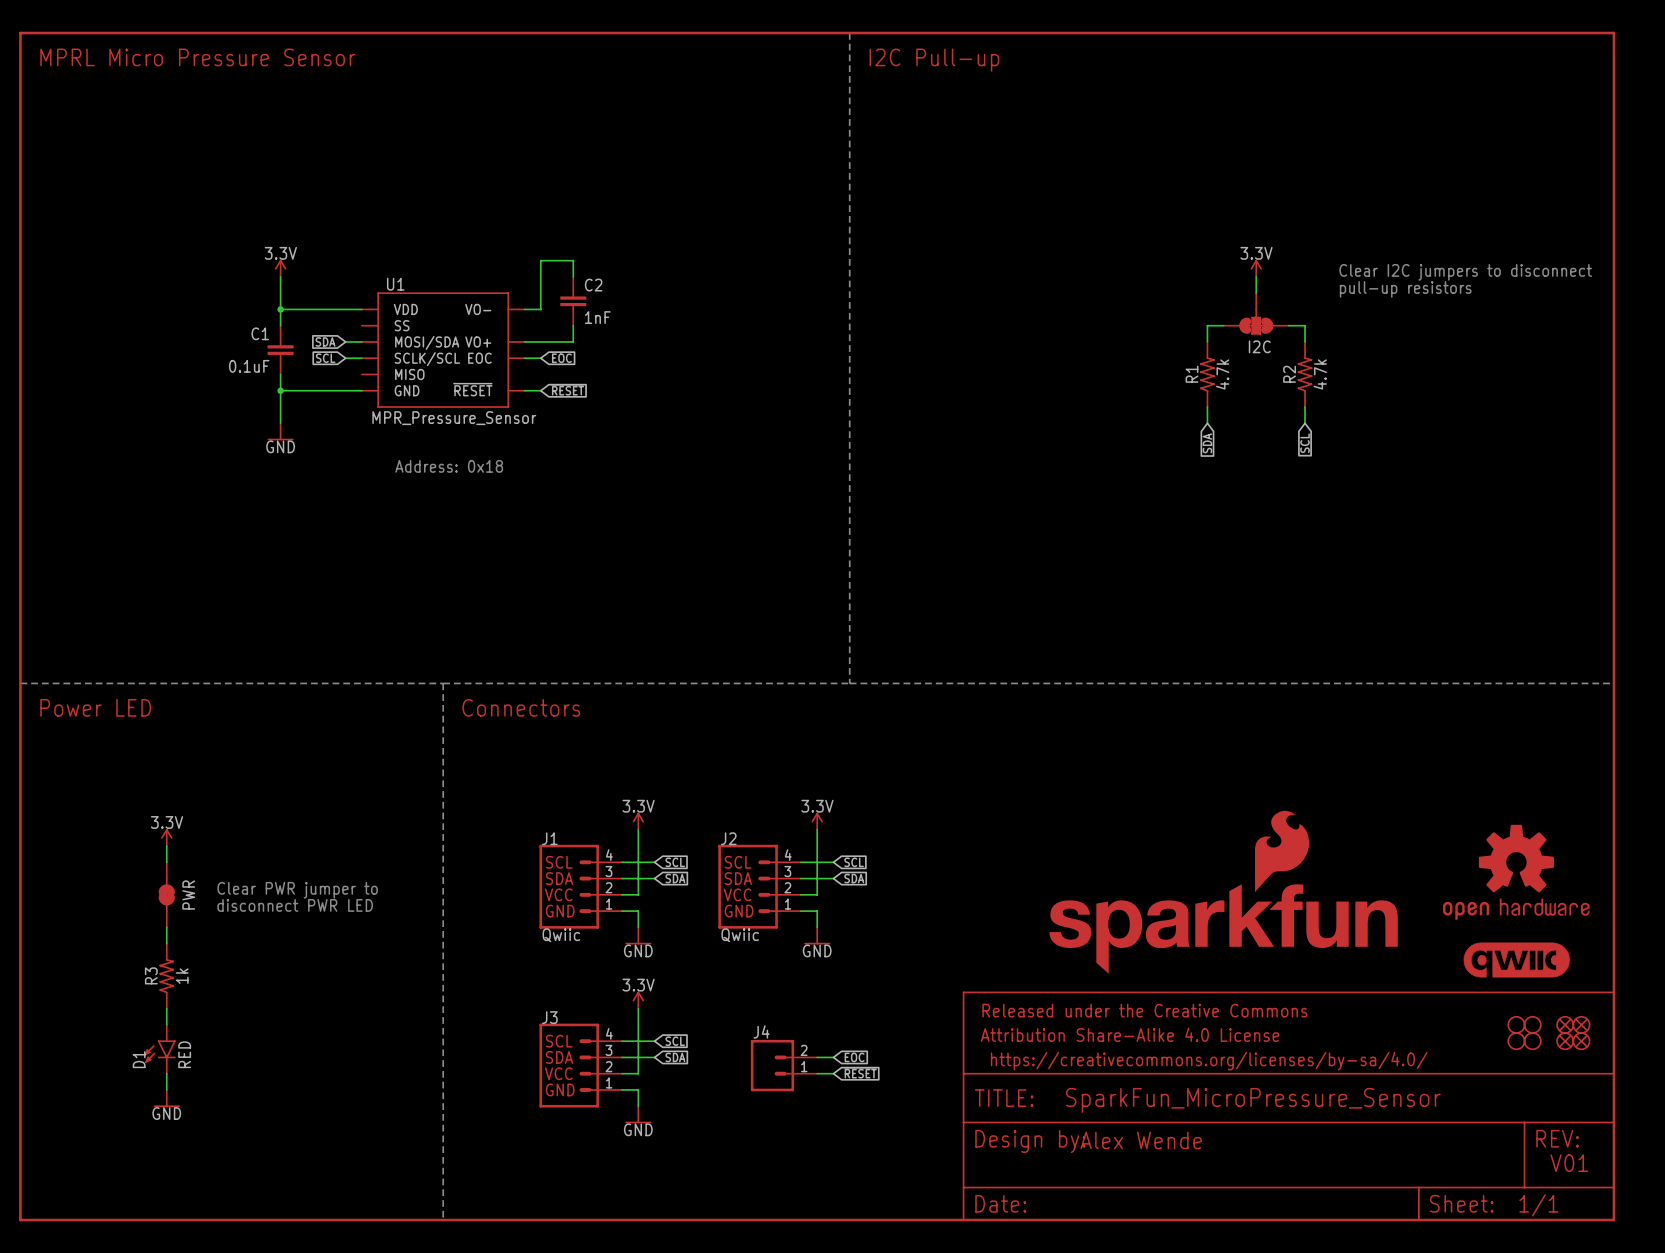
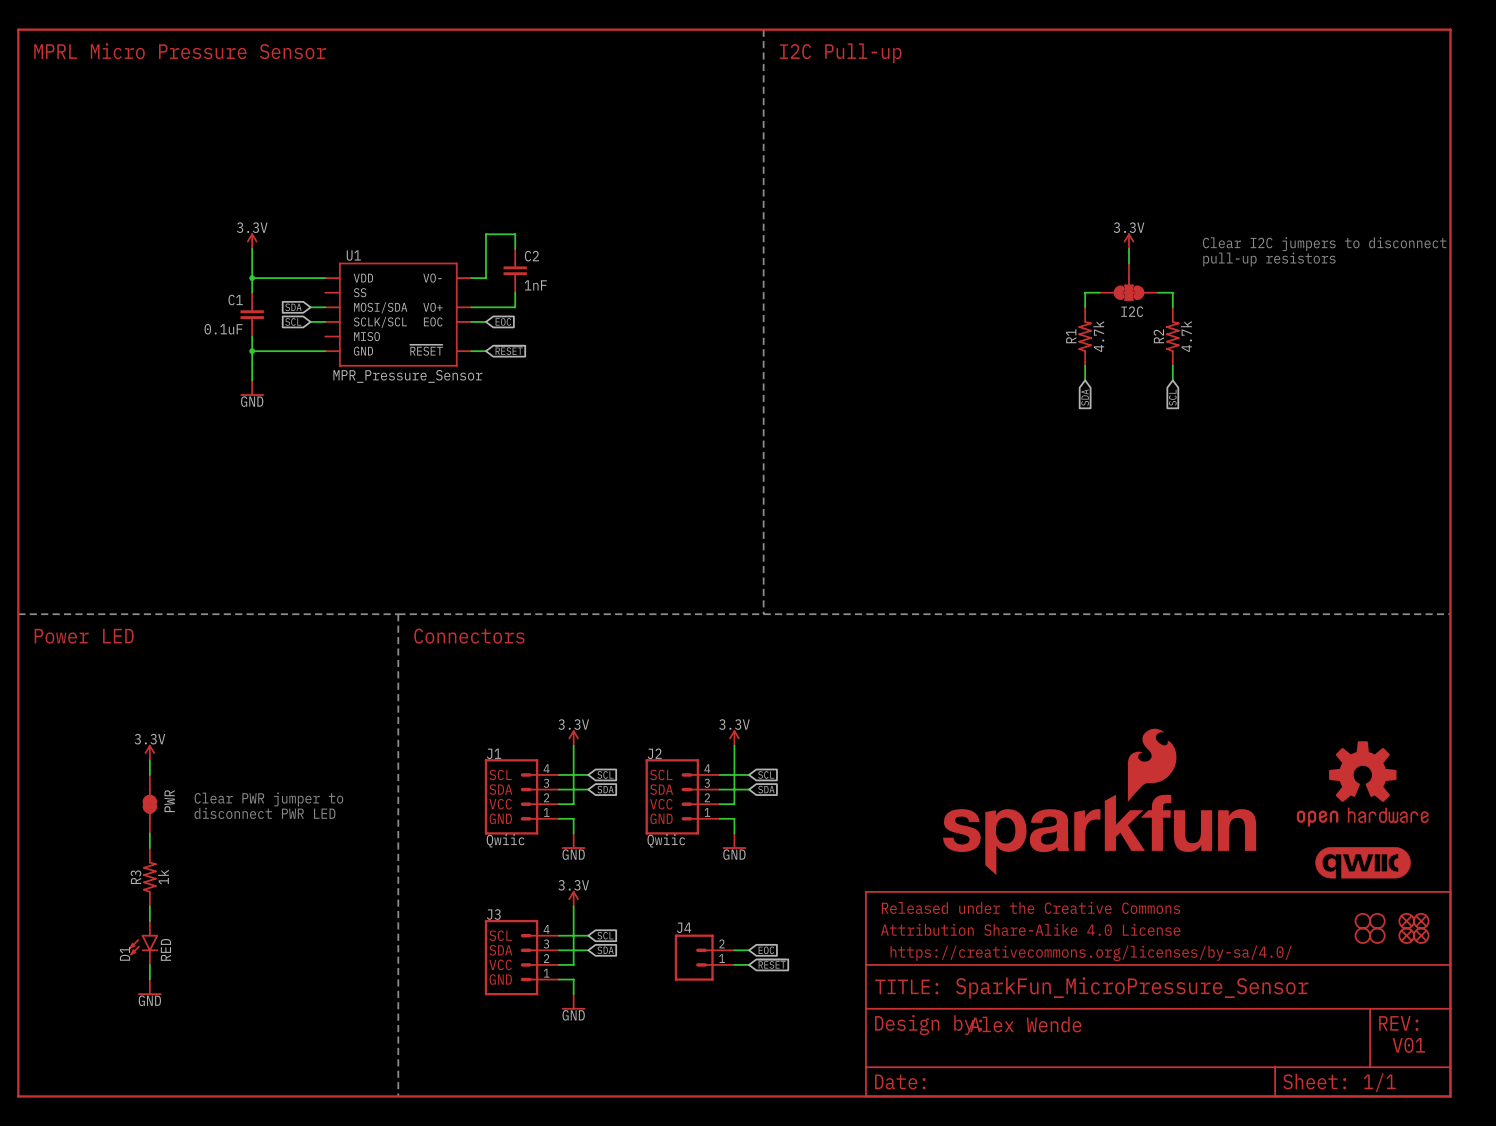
text: Address: 0x18 (449, 466) -> none

